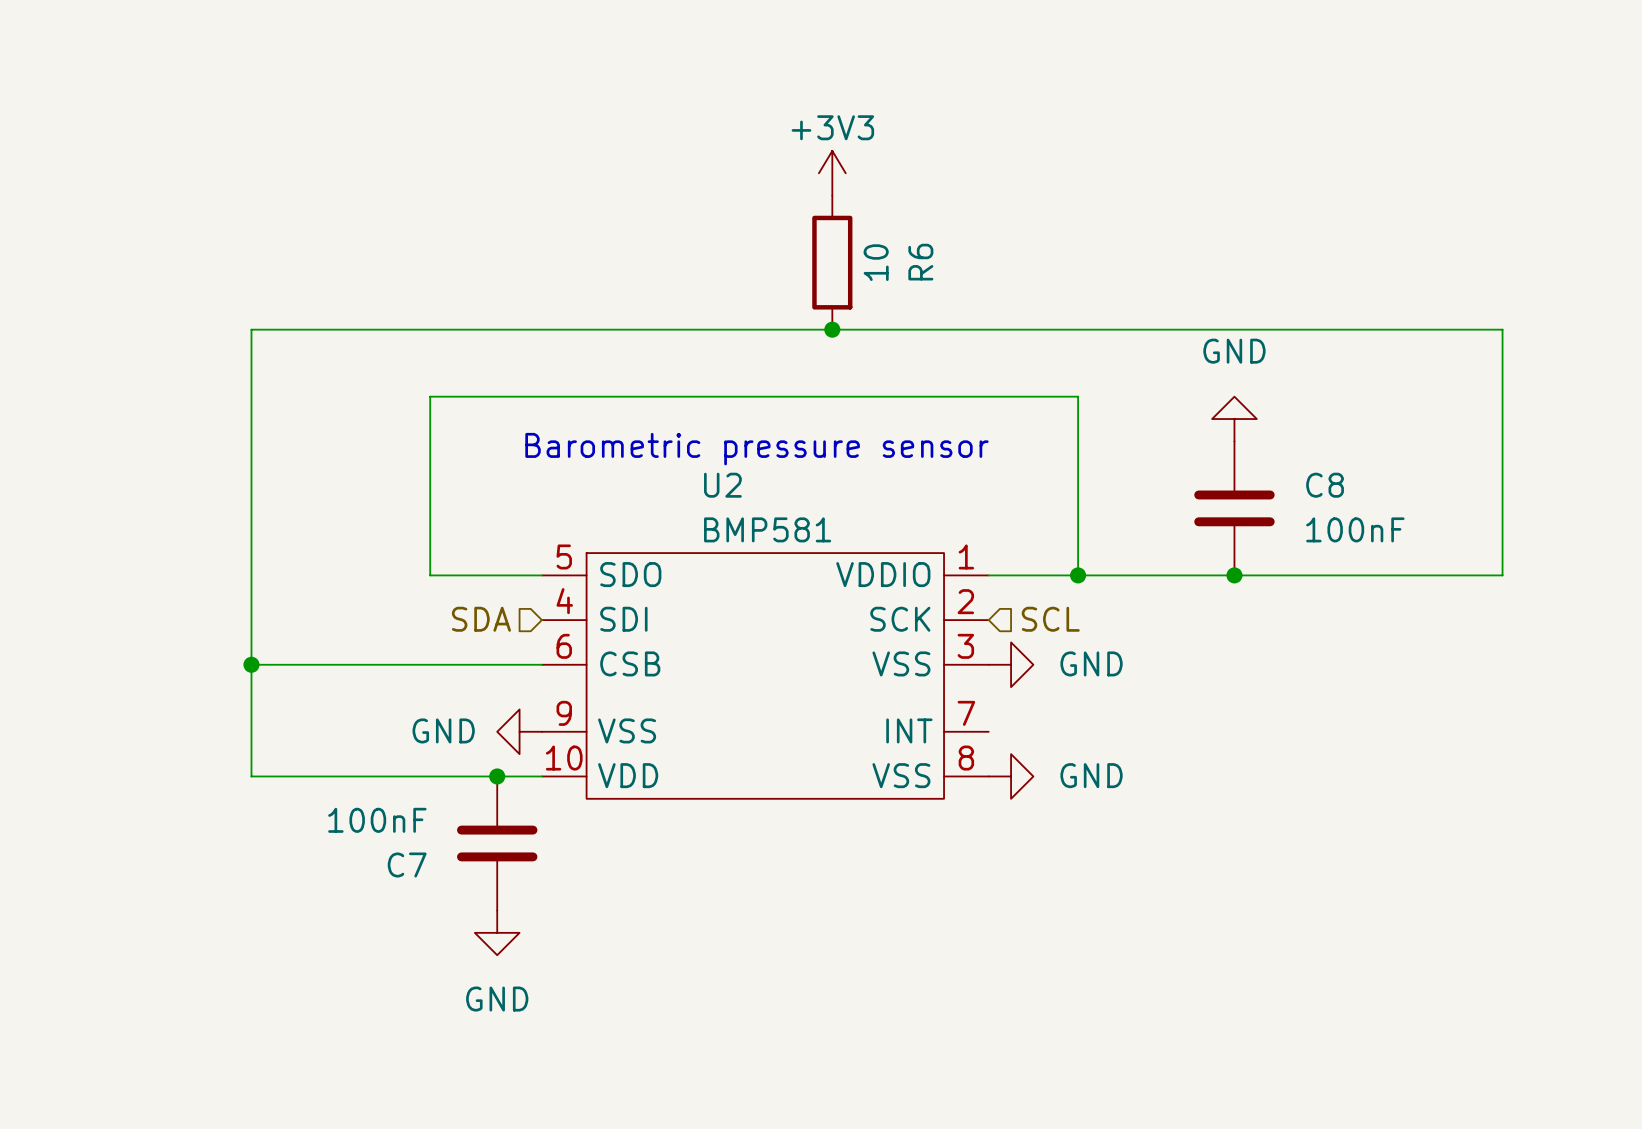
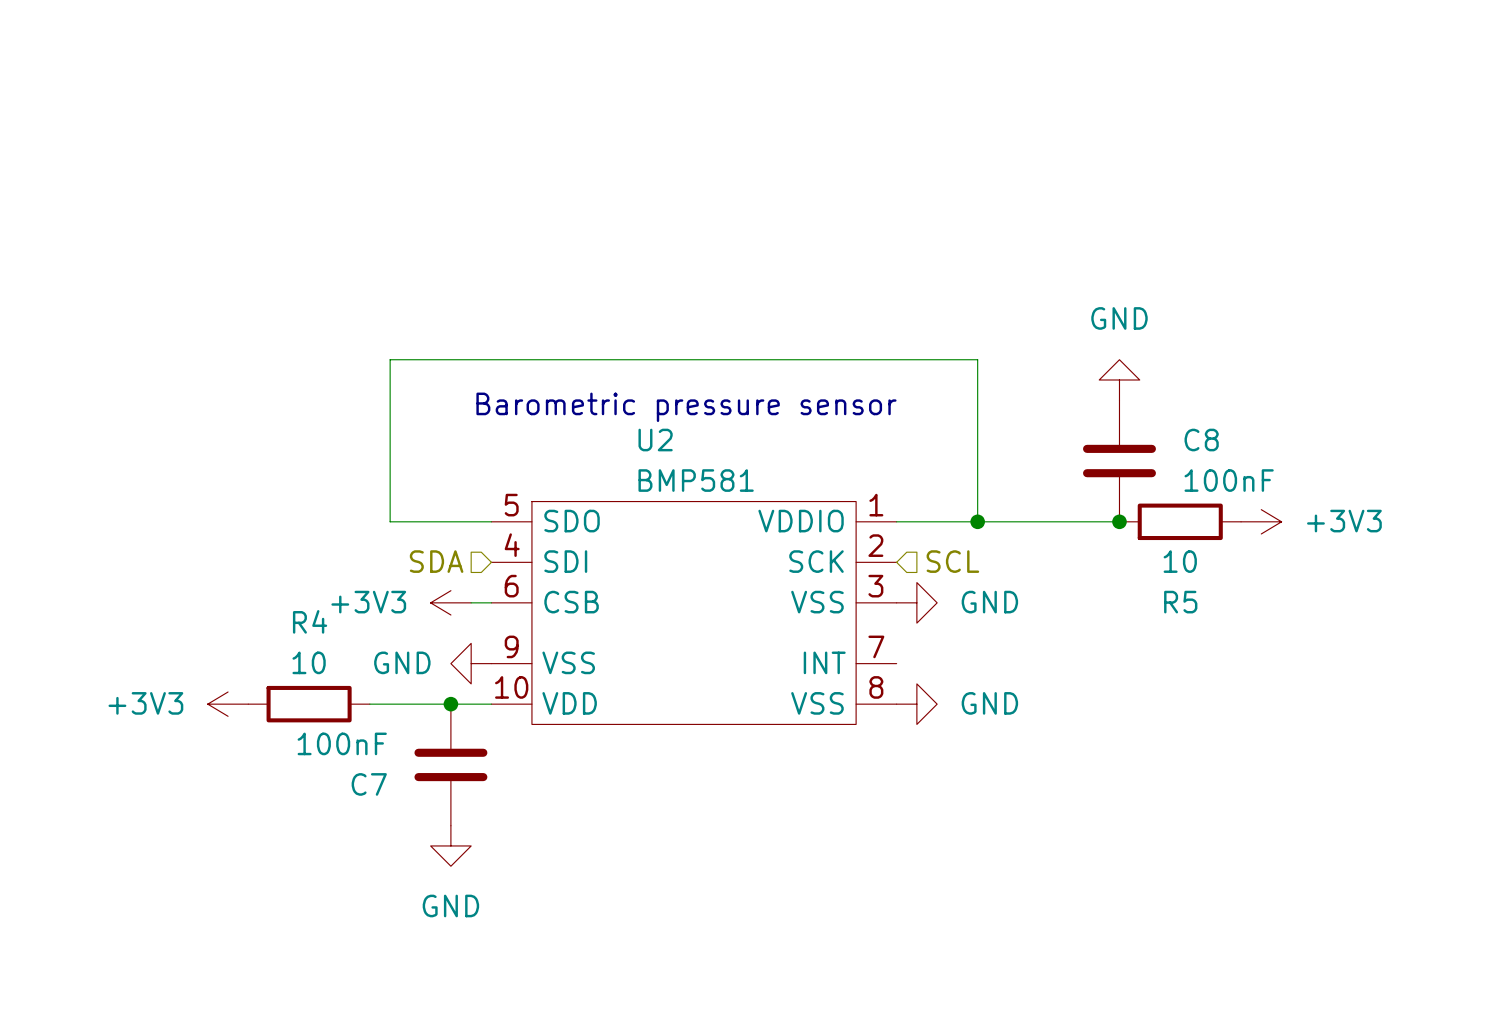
power symbol: +3V3 (832, 173) -> none
R6: 10 (832, 262) -> none
junction: (832, 329) -> none
wire: (1234, 575) (1502, 575) (1502, 329) (251, 329) (251, 776) (407, 776) -> none
R5: none -> 10 (1180, 521)
power symbol: none -> +3V3 (1261, 521)
wire: (251, 664) (519, 664) -> none
junction: (251, 664) -> none
power symbol: none -> +3V3 (450, 602)
power symbol: none -> +3V3 (228, 704)
R4: none -> 10 (309, 704)

